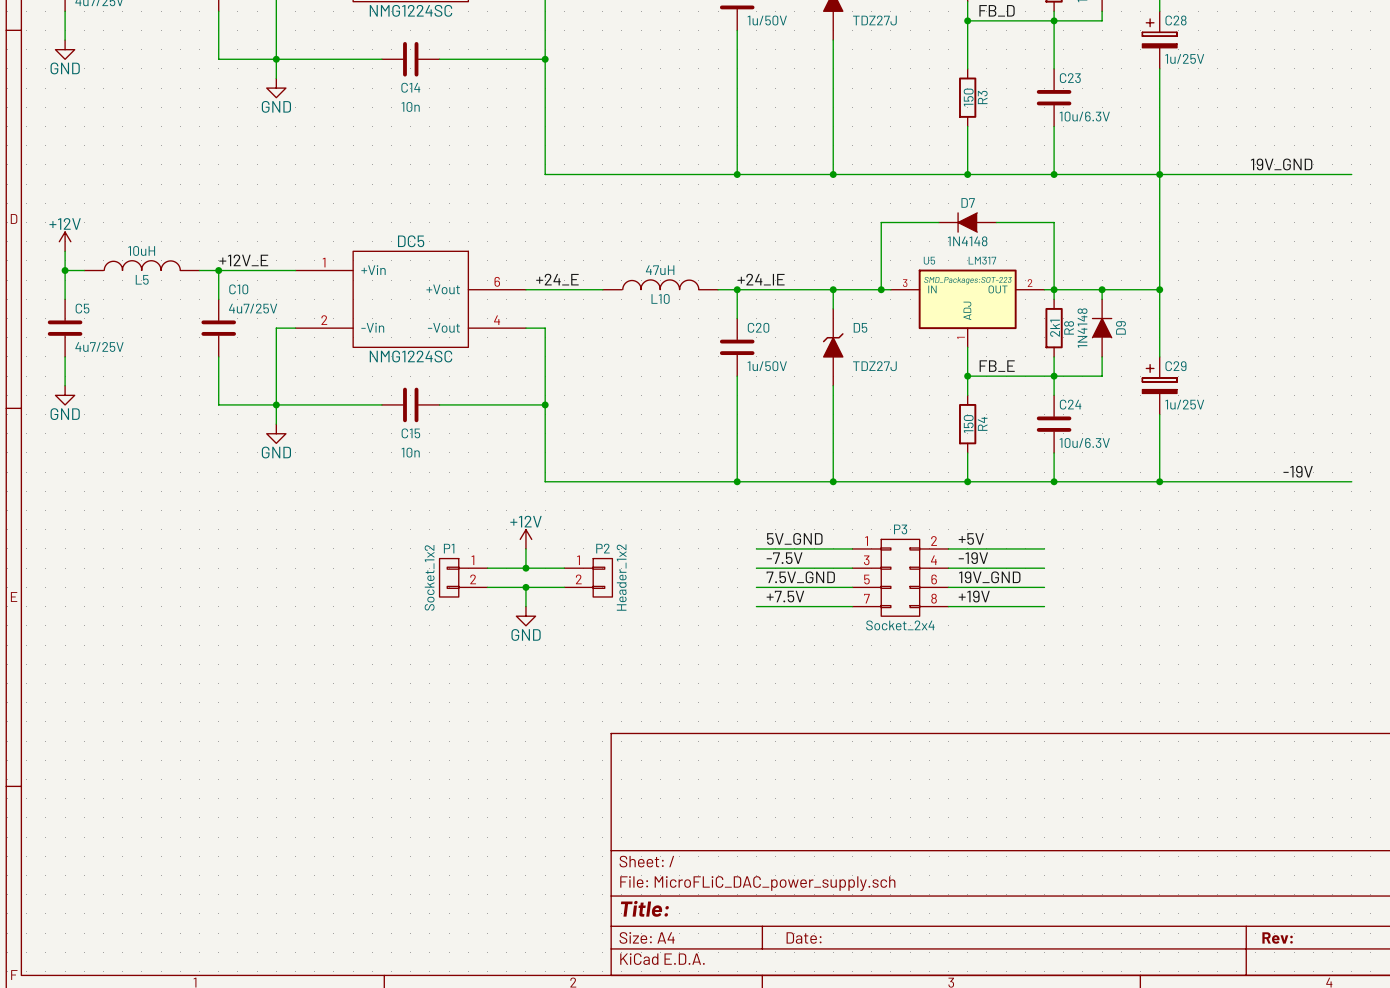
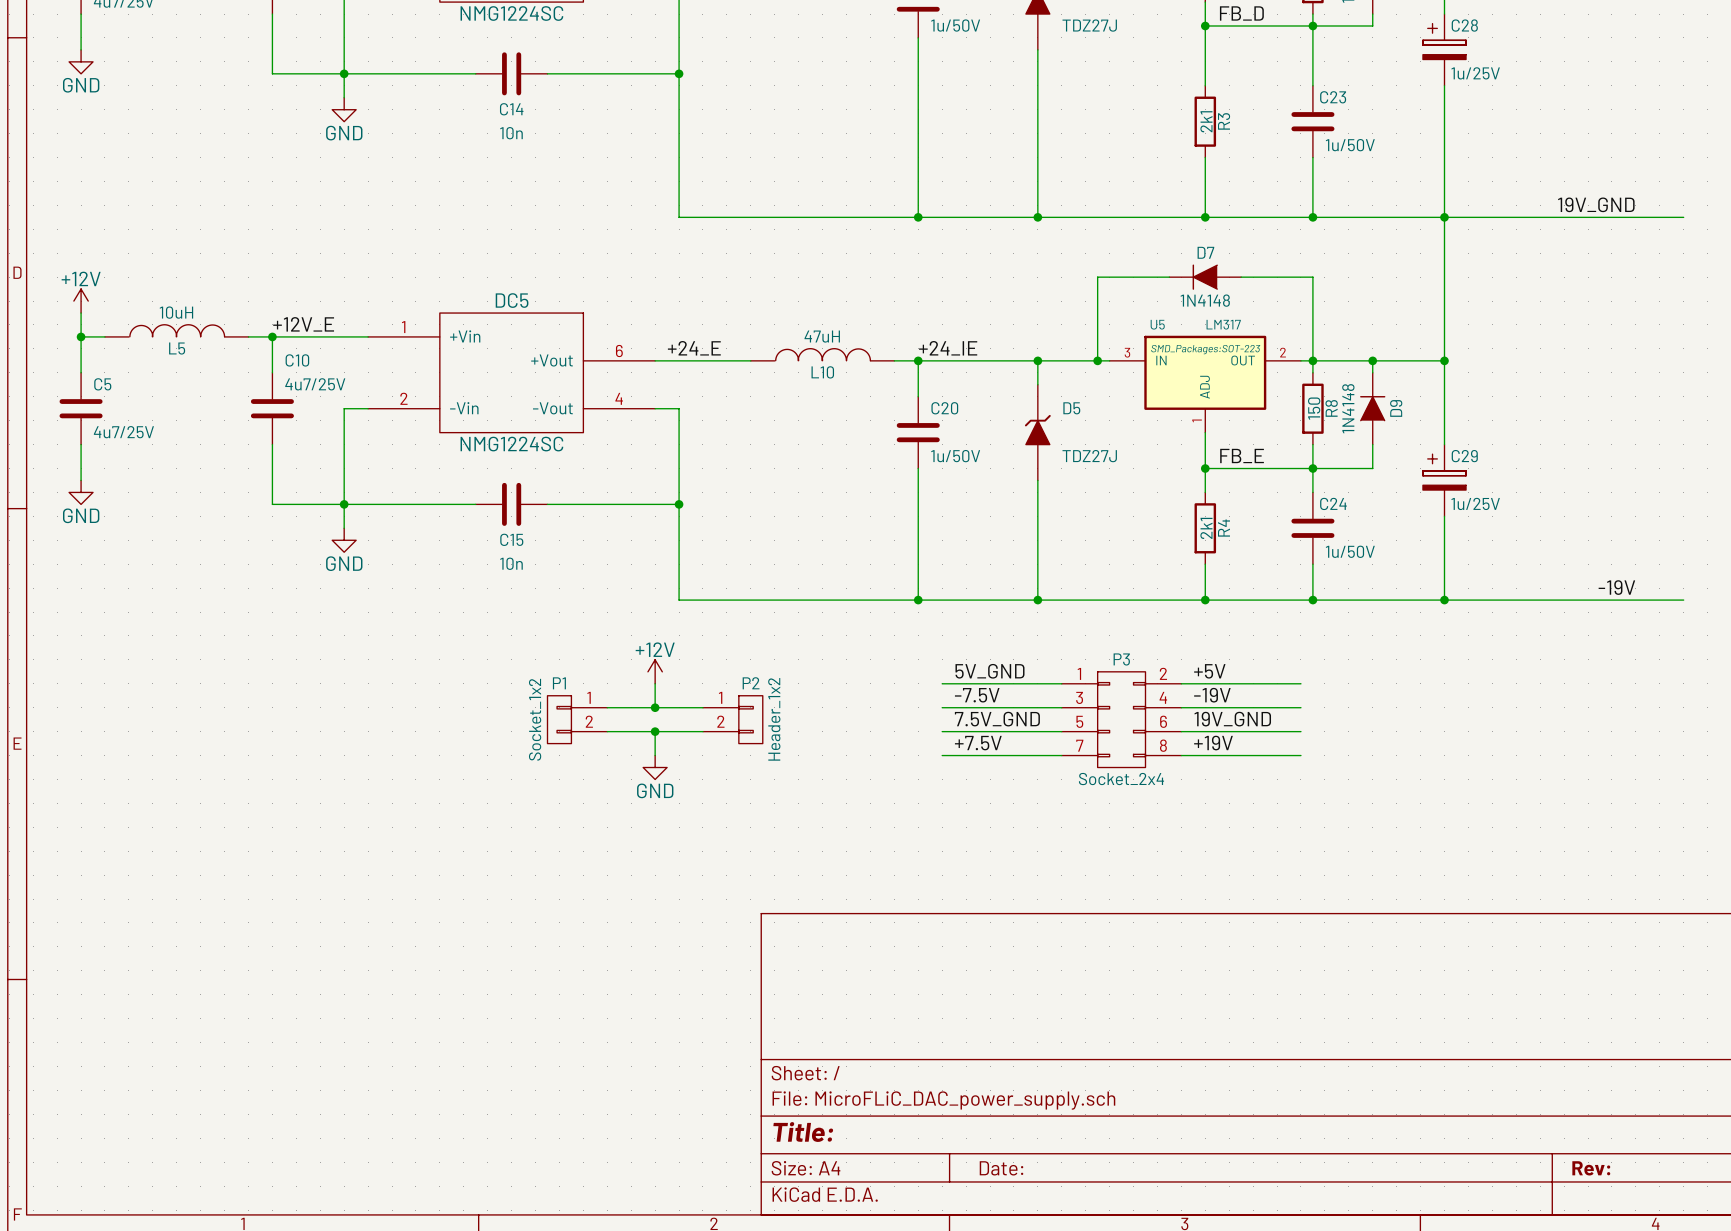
R3 value: 150 (968, 97) -> 2k1 (1206, 121)
C23 value: 10u/6.3V (1084, 116) -> 1u/50V (1350, 145)
R8 value: 2k1 (1055, 328) -> 150 (1314, 408)
R4 value: 150 (968, 424) -> 2k1 (1206, 528)
C24 value: 10u/6.3V (1084, 443) -> 1u/50V (1350, 551)

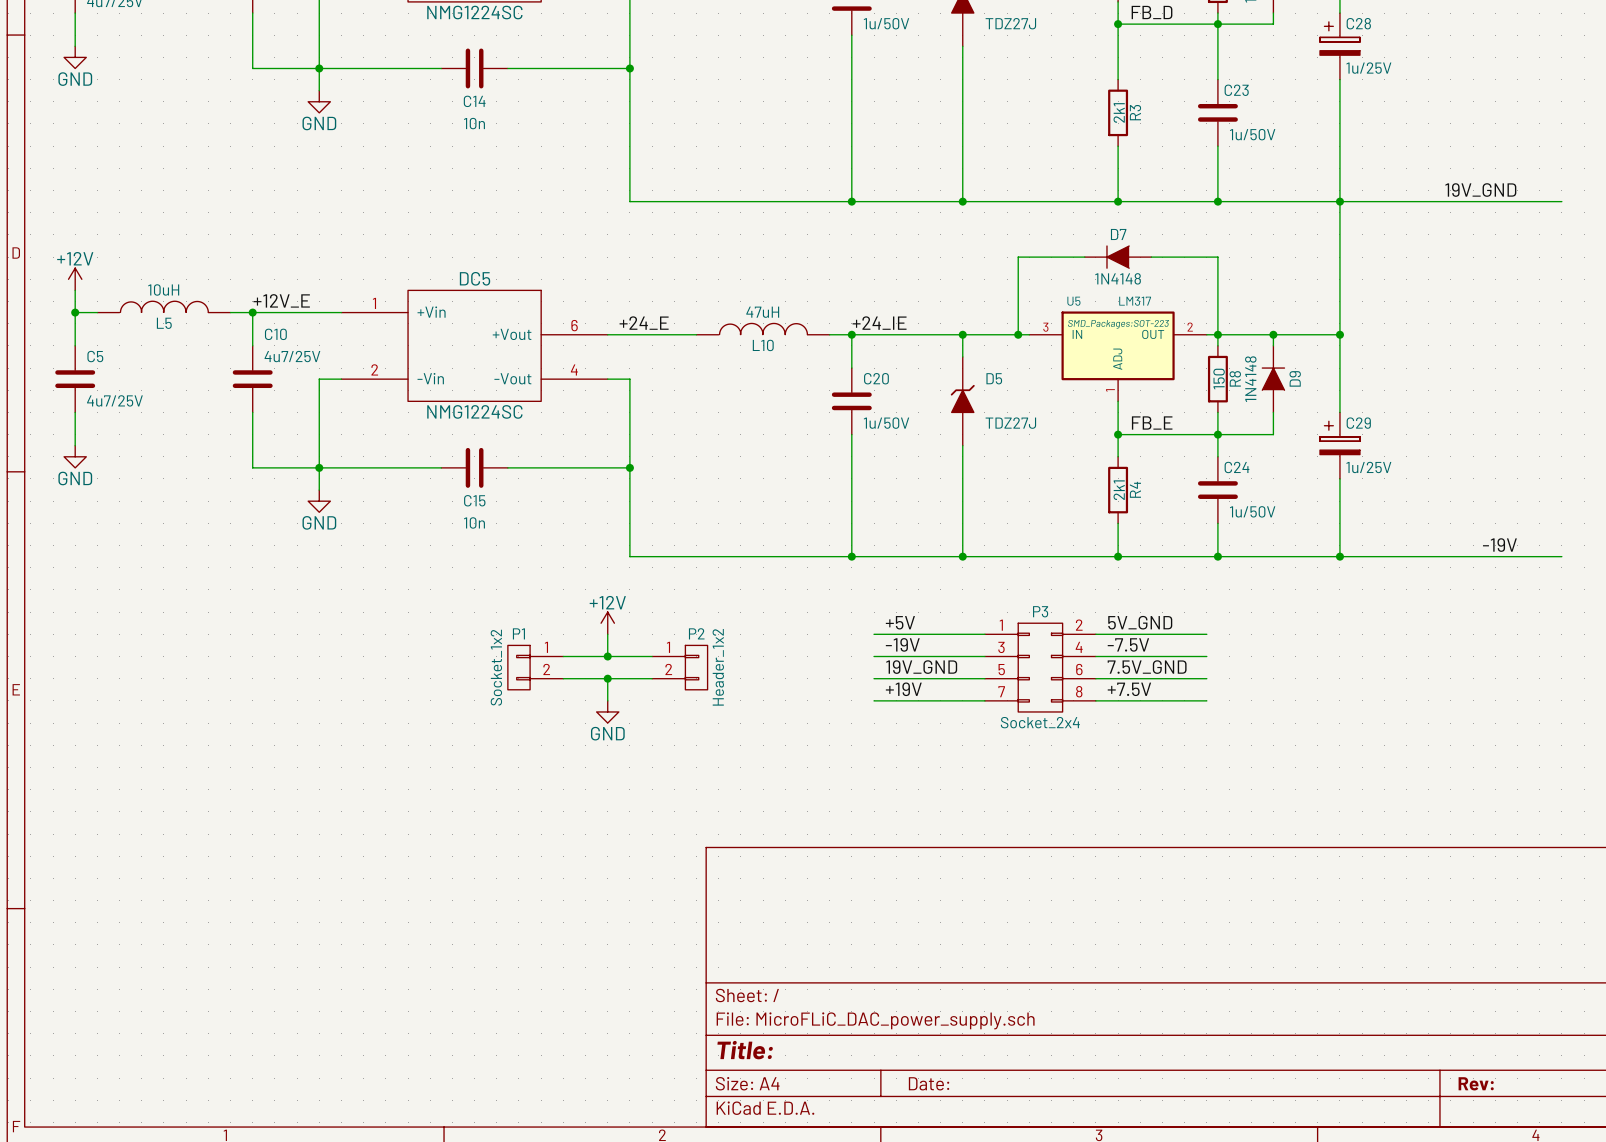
label: 5V_GND (989, 671) -> +5V (900, 622)
label: +5V (1209, 671) -> 5V_GND (1140, 622)
label: -7.5V (977, 695) -> -19V (902, 644)
label: -19V (1212, 695) -> -7.5V (1128, 644)
label: 7.5V_GND (997, 719) -> 19V_GND (921, 667)
label: 19V_GND (1232, 719) -> 7.5V_GND (1147, 667)
label: +7.5V (978, 743) -> +19V (903, 689)
label: +19V (1213, 743) -> +7.5V (1129, 689)

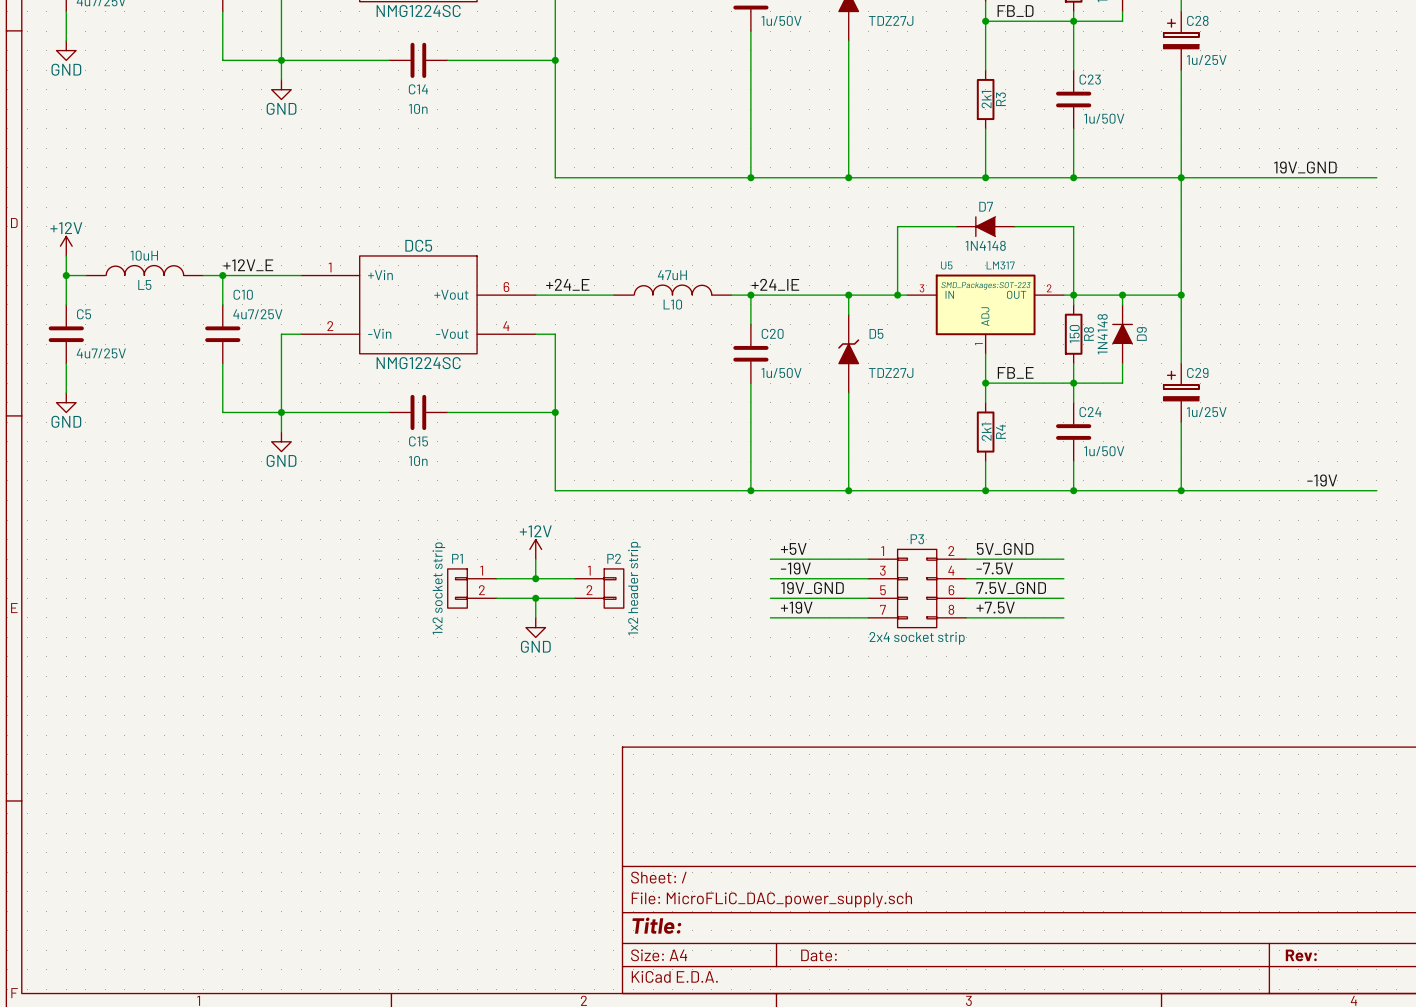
P1 value: Socket_1x2 (496, 667) -> 1x2 socket strip (438, 588)
P2 value: Header_1x2 (718, 667) -> 1x2 header strip (634, 588)
P3 value: Socket_2x4 (1040, 722) -> 2x4 socket strip (917, 638)

